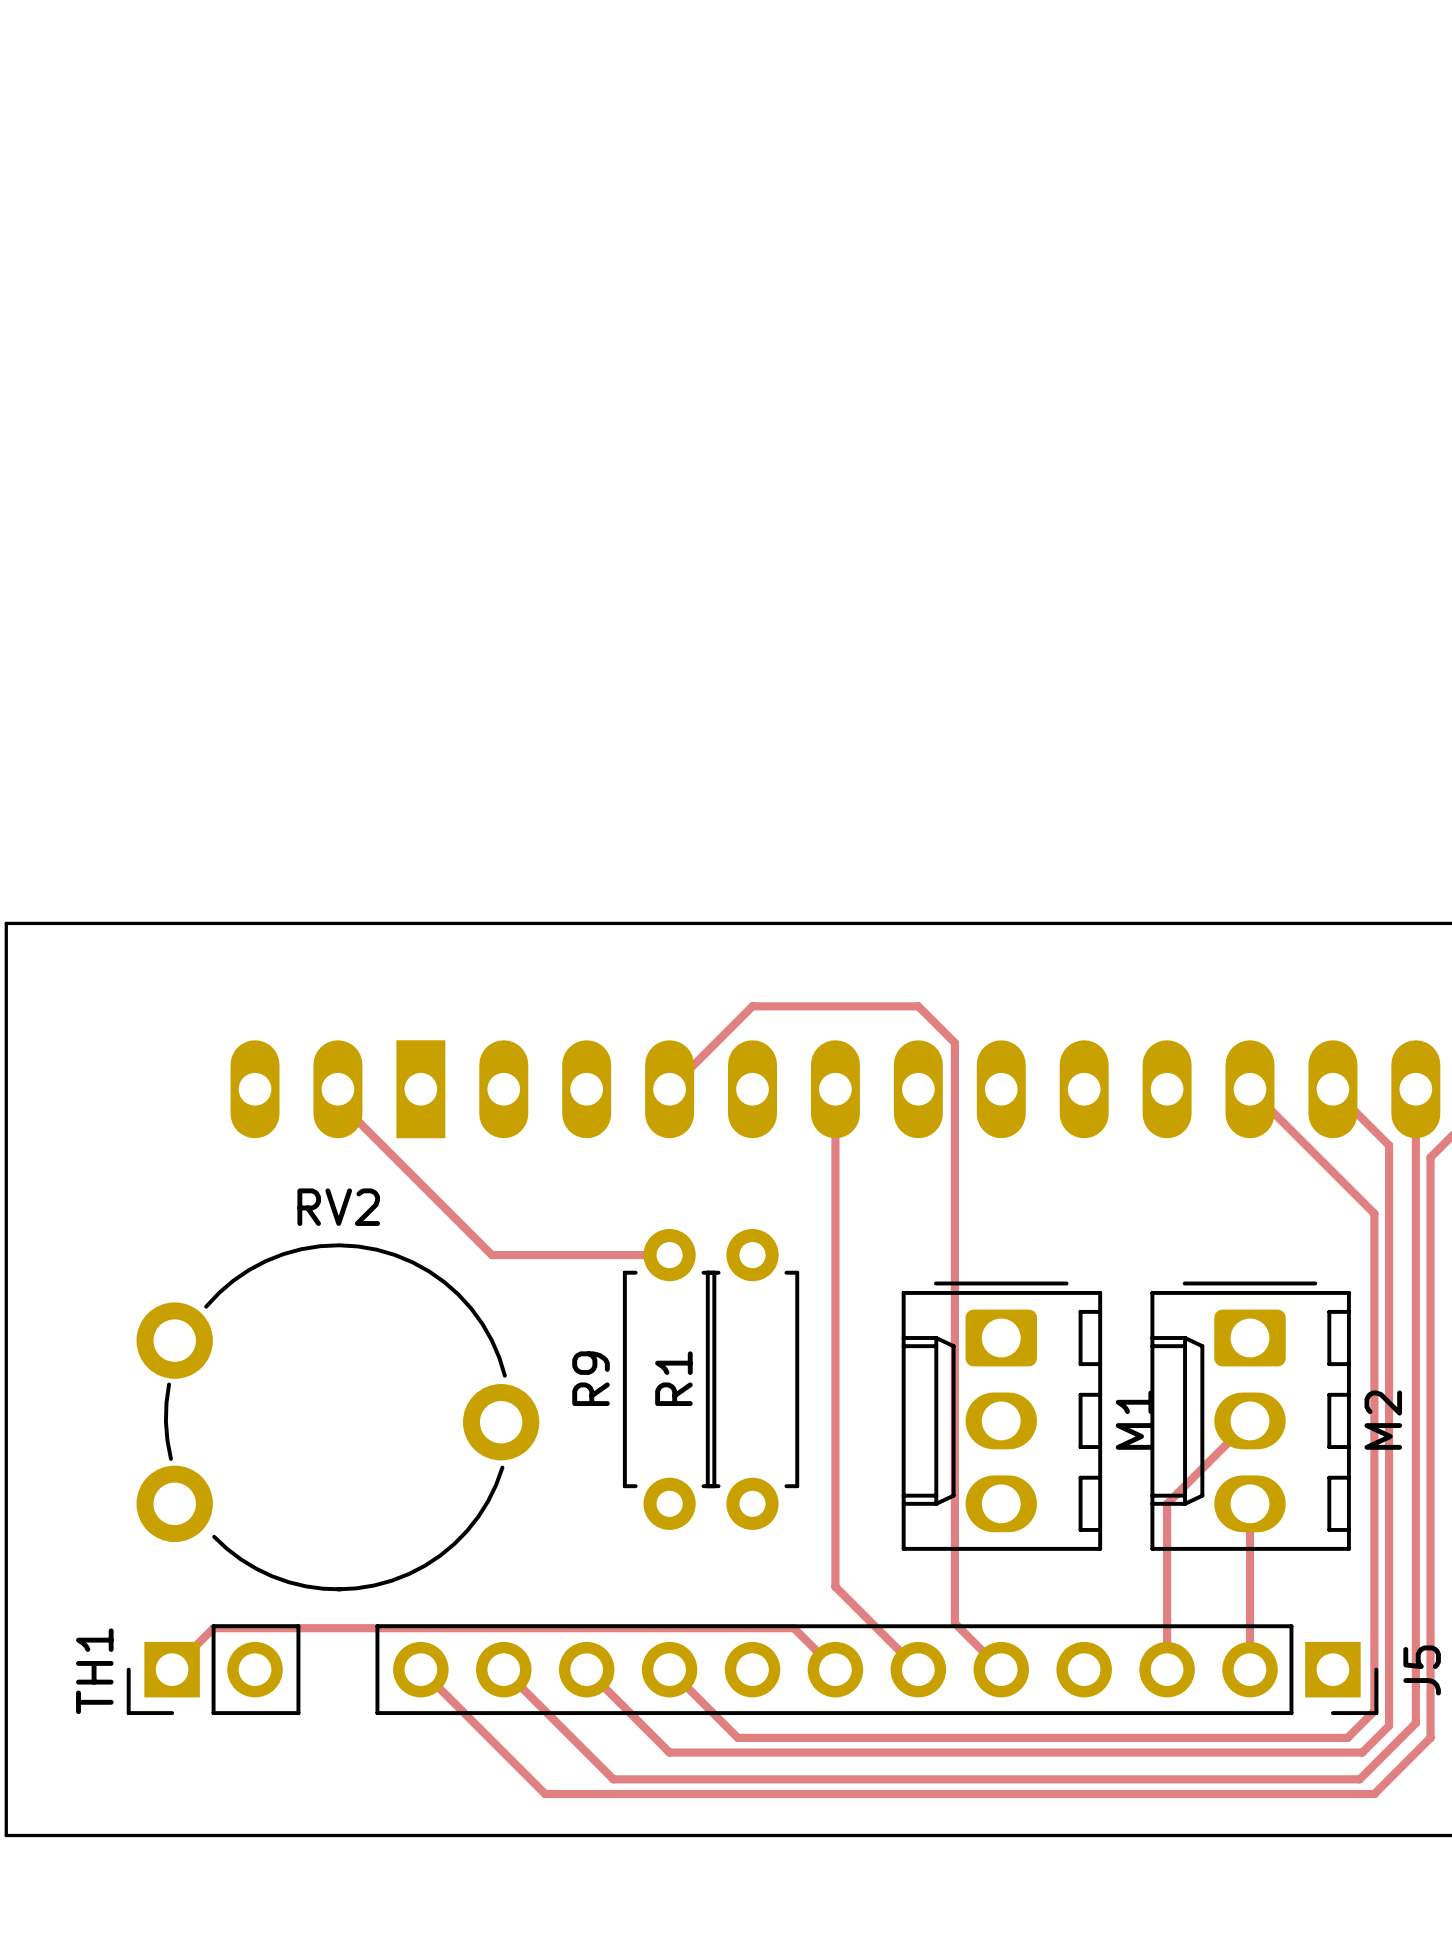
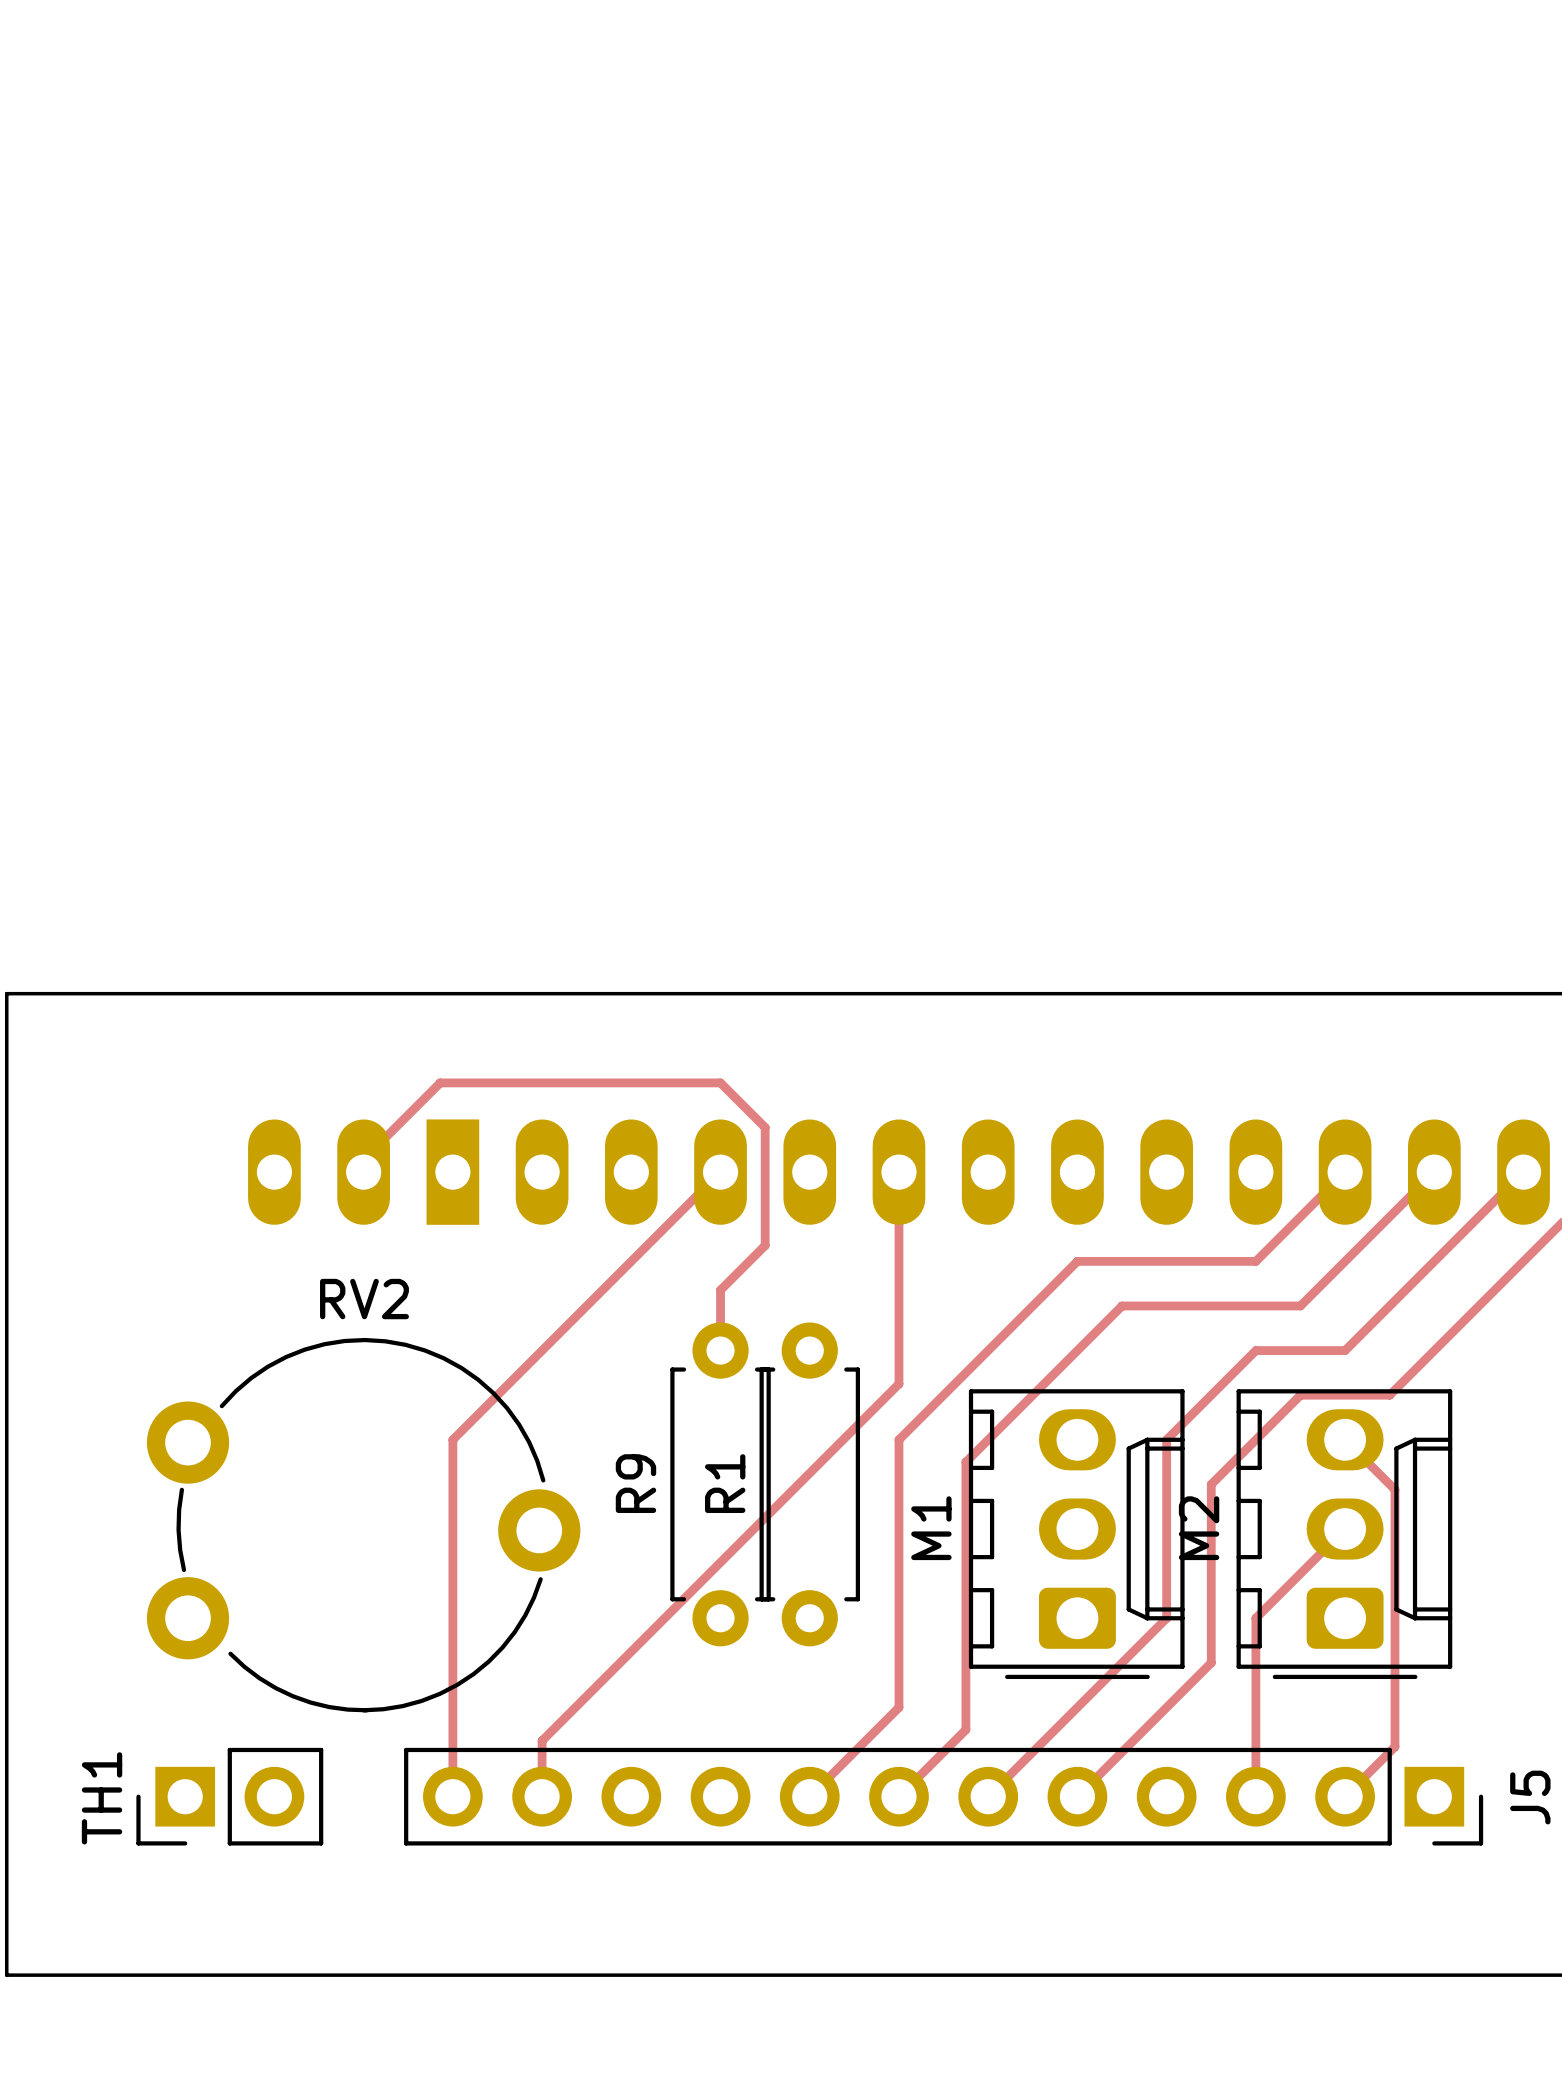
track: (337, 1089) (337, 1101) (492, 1255) (669, 1255) -> (363, 1172) (363, 1159) (440, 1082) (720, 1082) (765, 1127) (765, 1245) (720, 1290) (720, 1350)
track: (669, 1089) (752, 1006) (918, 1006) (954, 1042) (954, 1623) (1001, 1669) -> (720, 1172) (452, 1439) (452, 1796)
track: (1250, 1089) (1374, 1213) (1374, 1711) (1347, 1737) (737, 1737) (669, 1669) -> (1345, 1172) (1255, 1261) (1077, 1261) (898, 1439)
track: (1332, 1089) (1389, 1145) (1389, 1725) (1362, 1752) (669, 1752) (586, 1669) -> (1434, 1172) (1300, 1305) (1122, 1305) (965, 1462) (965, 1729) (898, 1796)
track: (1415, 1089) (1415, 1723) (1359, 1779) (613, 1779) (503, 1669) -> (1523, 1172) (1345, 1350) (1255, 1350) (1166, 1439) (1166, 1618) (988, 1796)
track: (1430, 1157) (1430, 1737) (1374, 1794) (545, 1794) (420, 1669) -> (1539, 1245) (1389, 1395) (1300, 1395) (1211, 1484) (1211, 1662) (1077, 1796)
track: (835, 1286) (835, 1338) -> (898, 1383) (542, 1740) (542, 1796)
M1 rotation: 0° (1001, 1416) -> 180° (1076, 1534)
M2 rotation: 0° (1250, 1416) -> 180° (1344, 1534)
track: (1250, 1503) (1250, 1669) -> (1345, 1439) (1394, 1489) (1394, 1746) (1345, 1796)
track: (835, 1586) (918, 1669) -> (898, 1707) (809, 1796)
track: (172, 1669) (213, 1628) (793, 1628) (835, 1669) -> none

